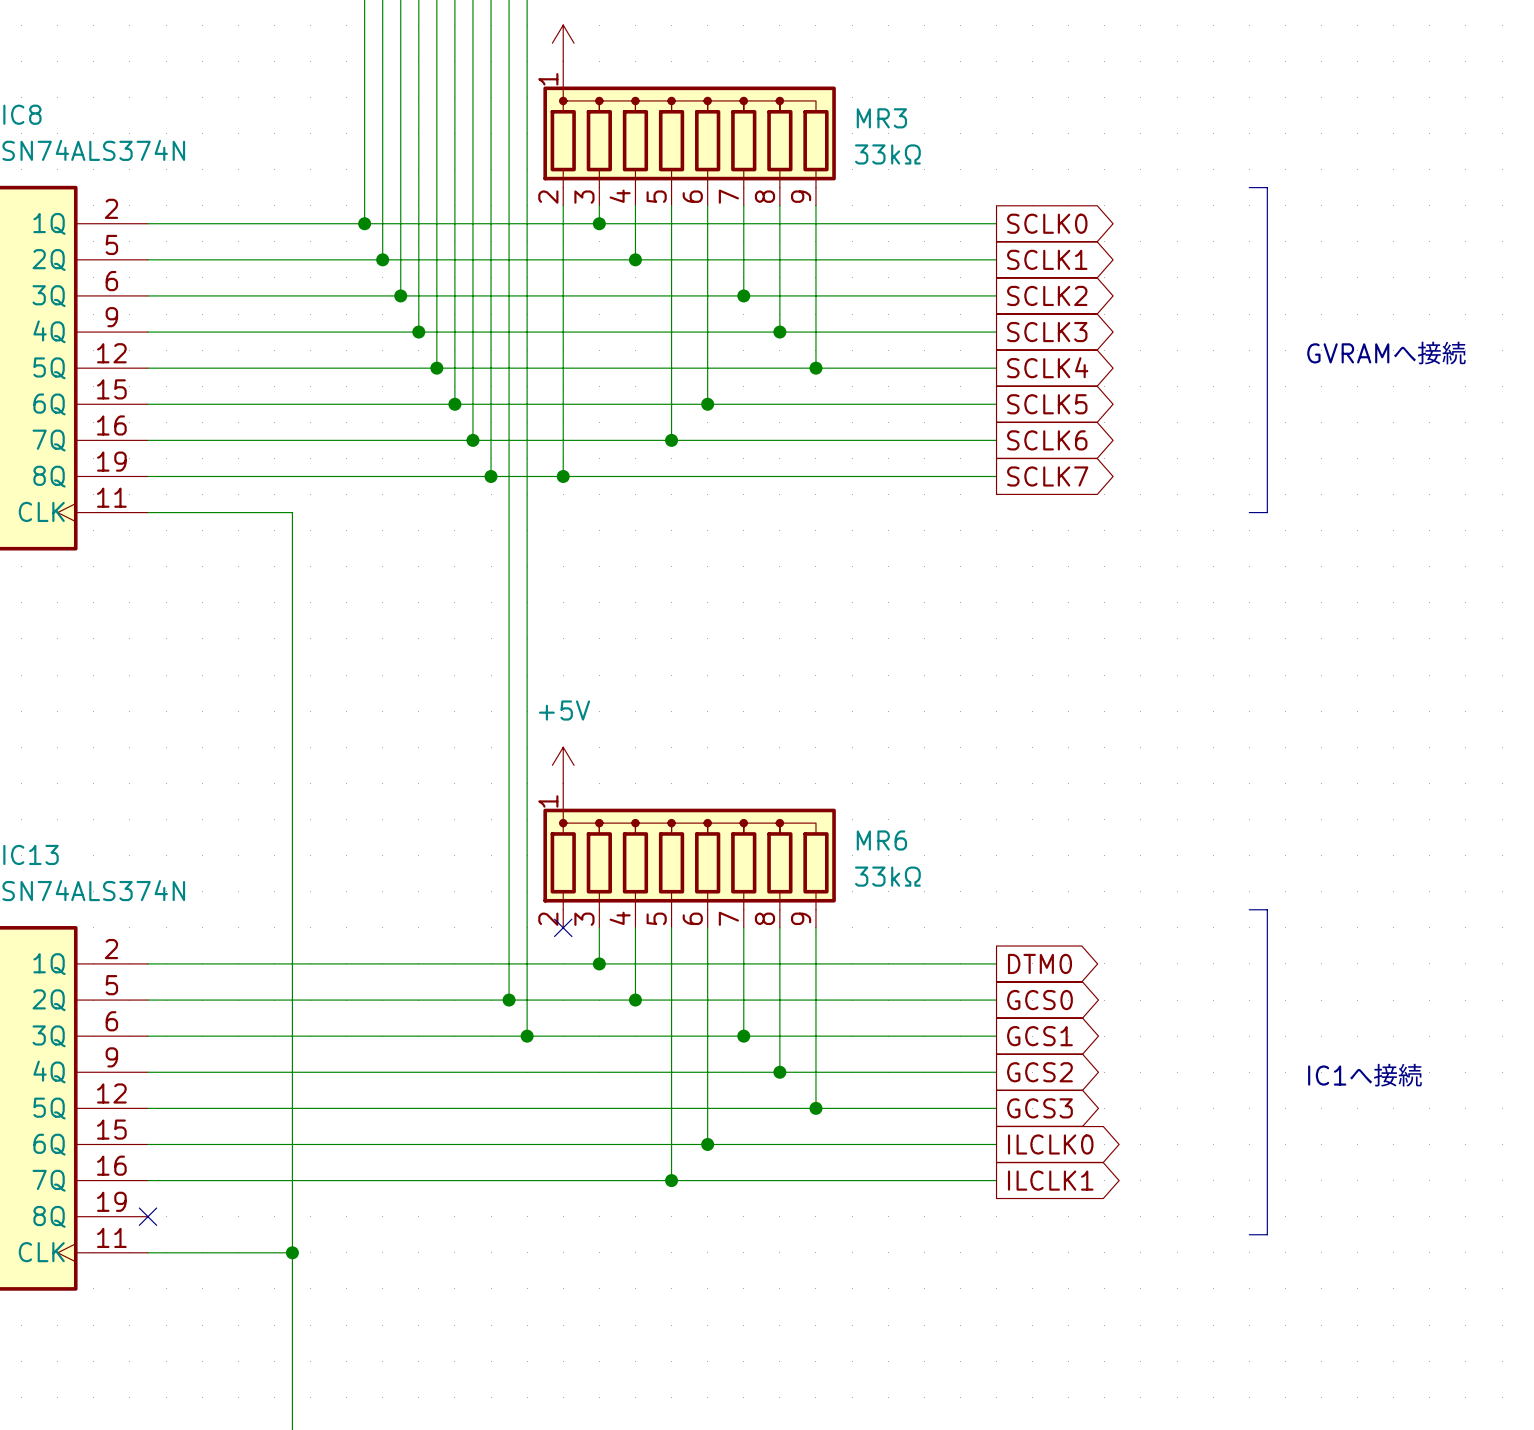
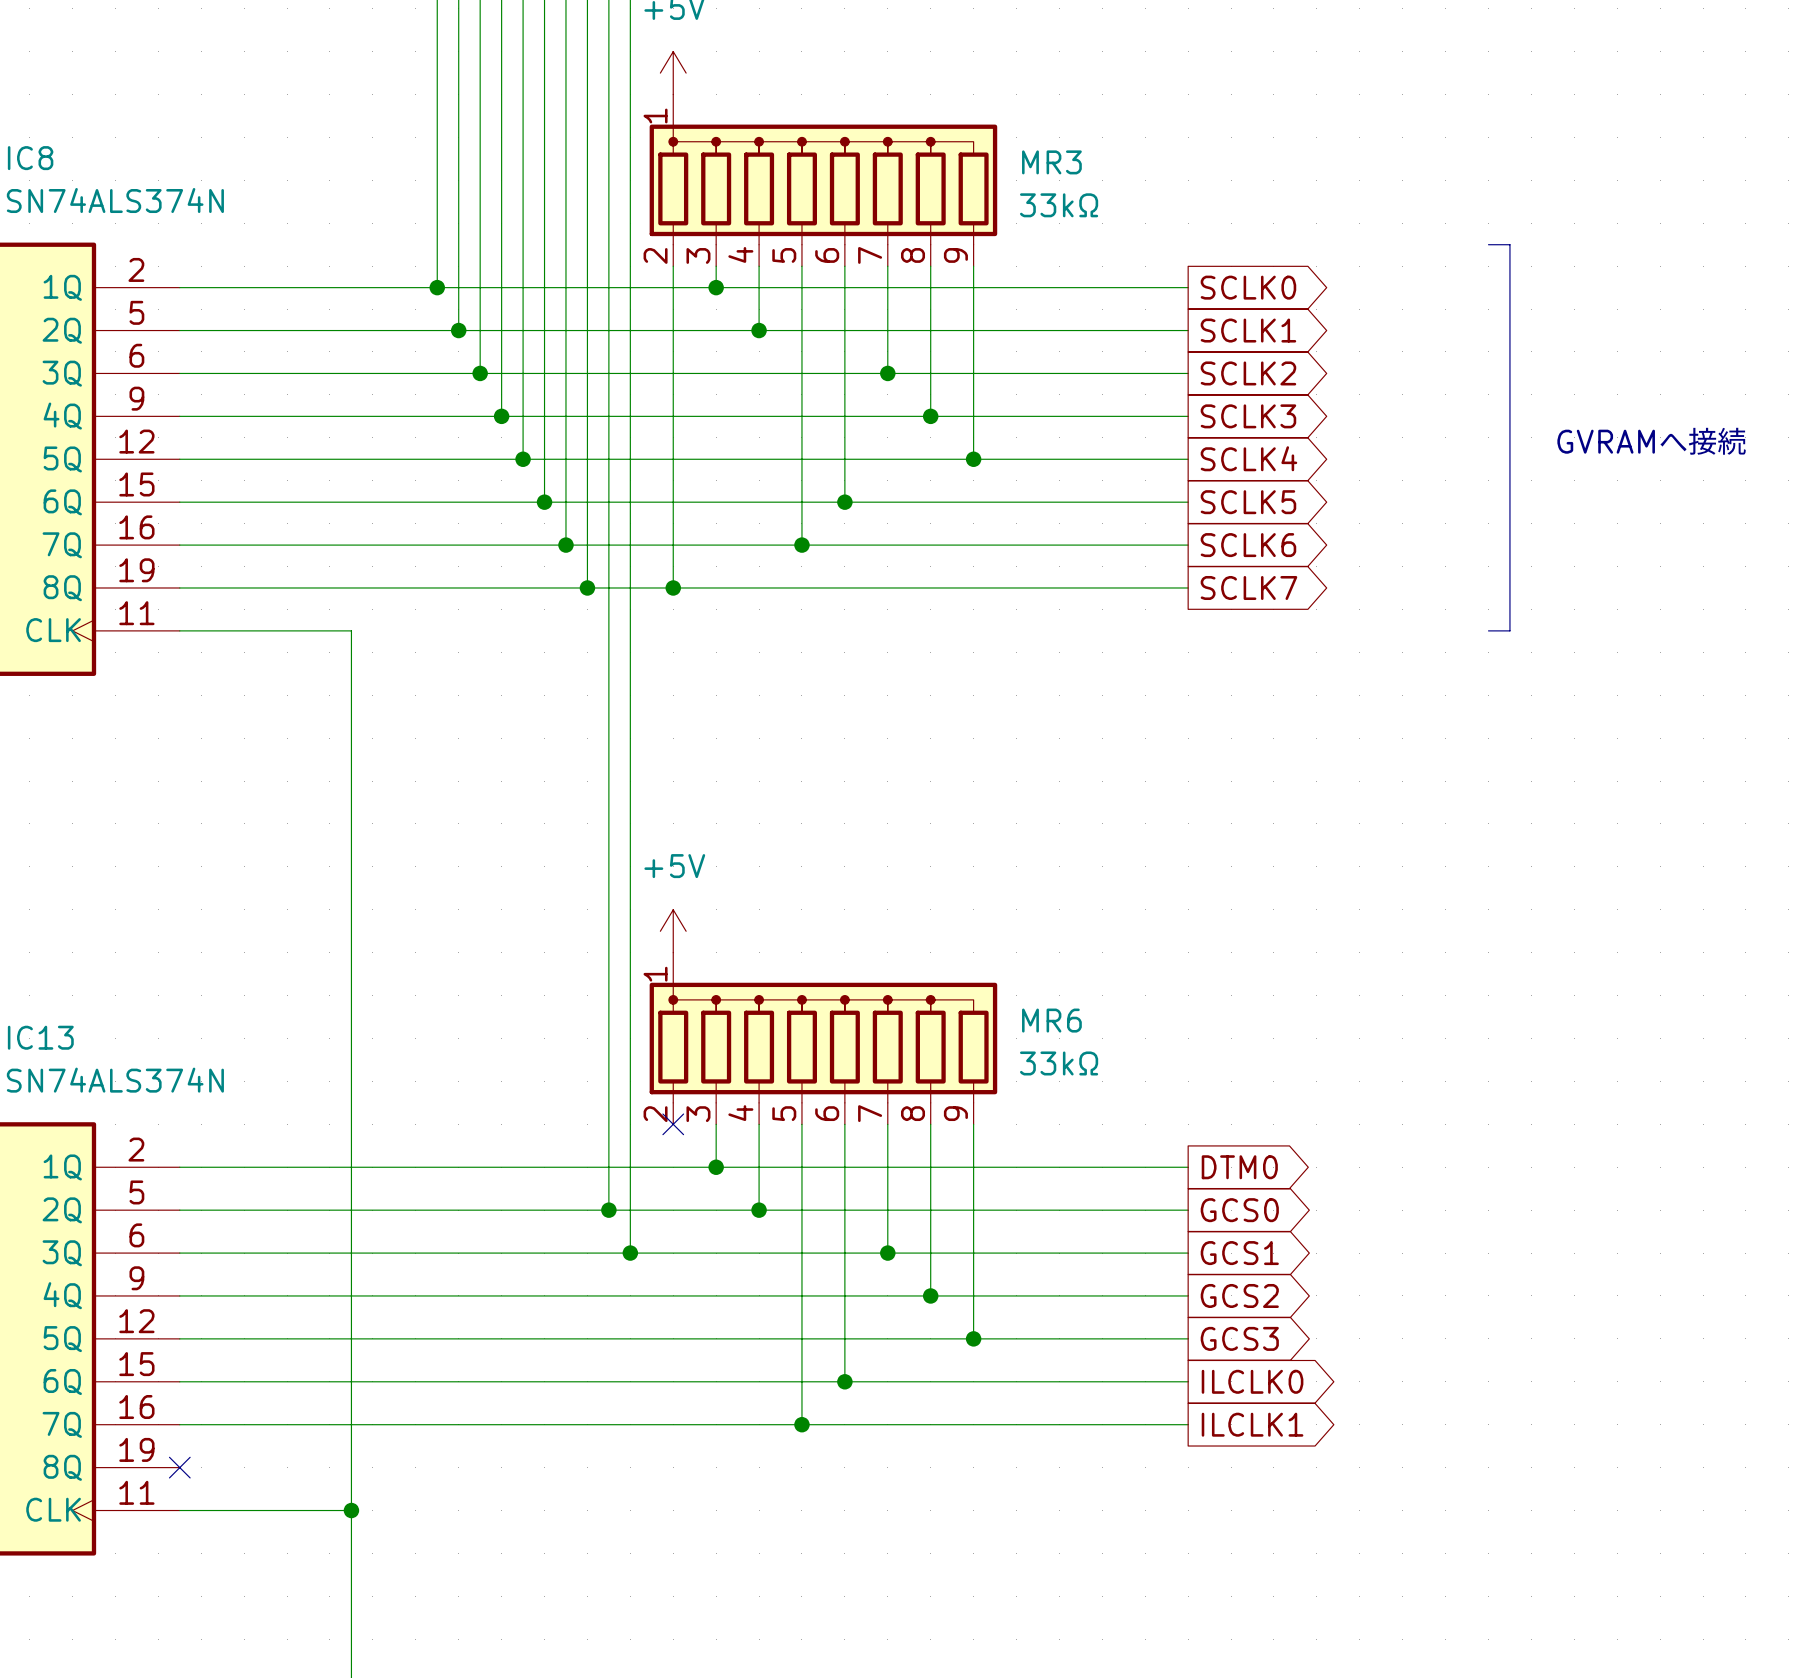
line: (1249, 909) (1267, 909) (1267, 1234) (1249, 1234) -> none
text: IC1へ接続 (1365, 1075) -> none

